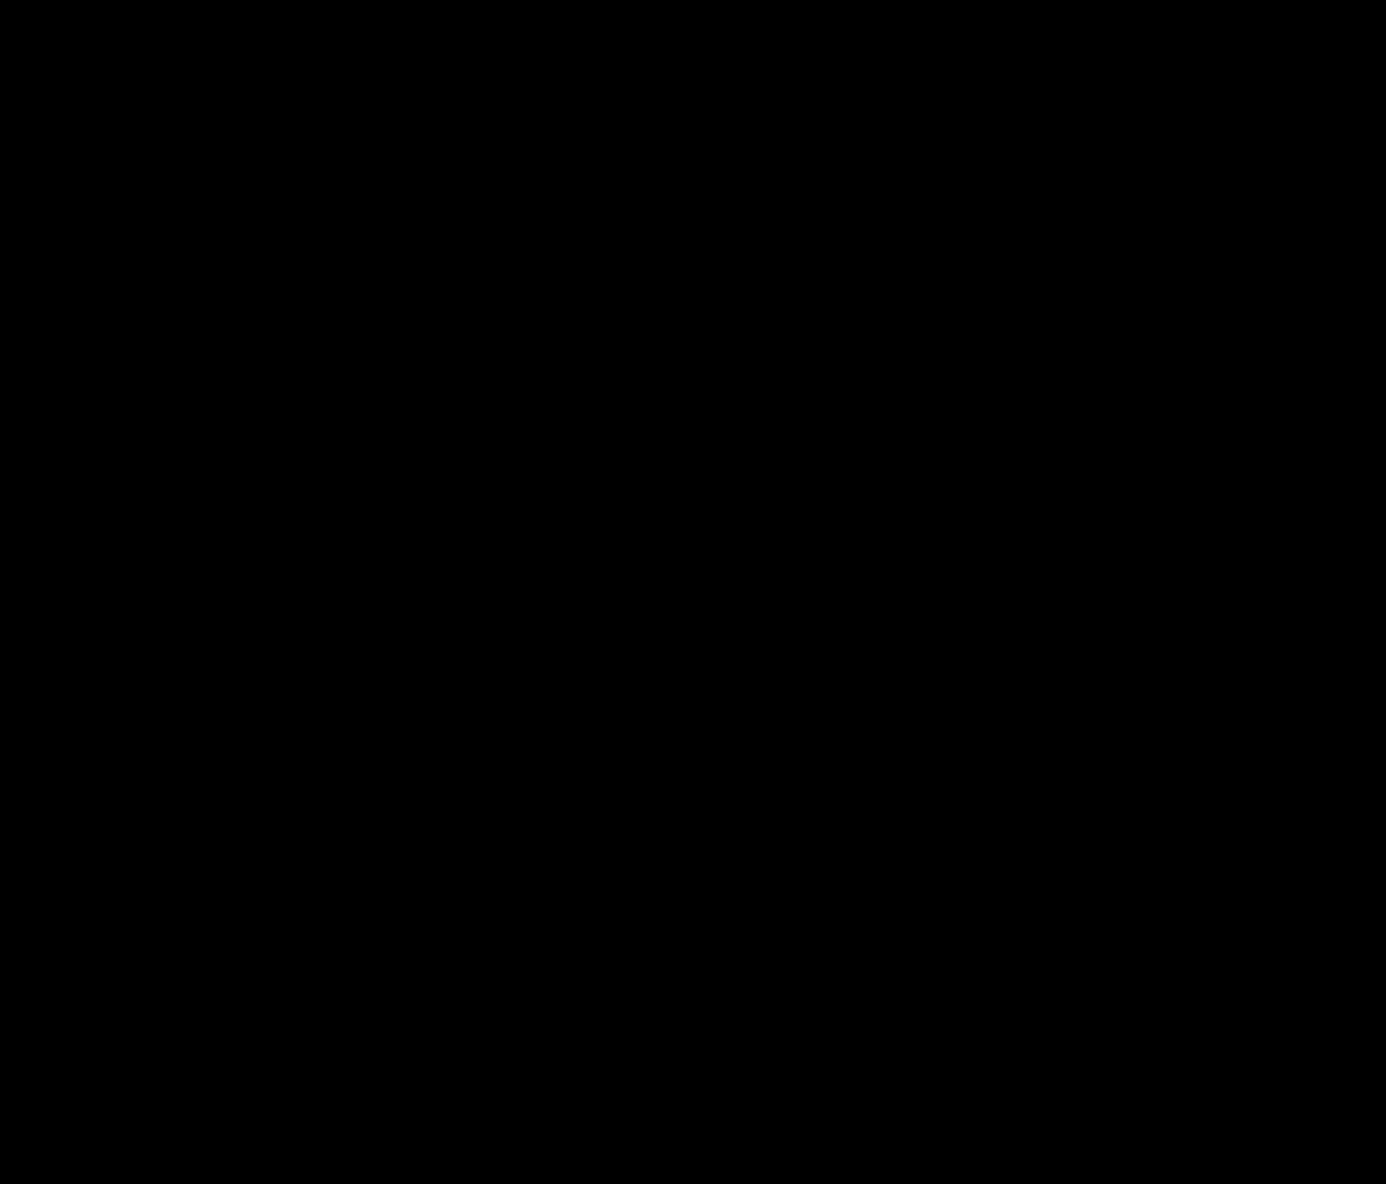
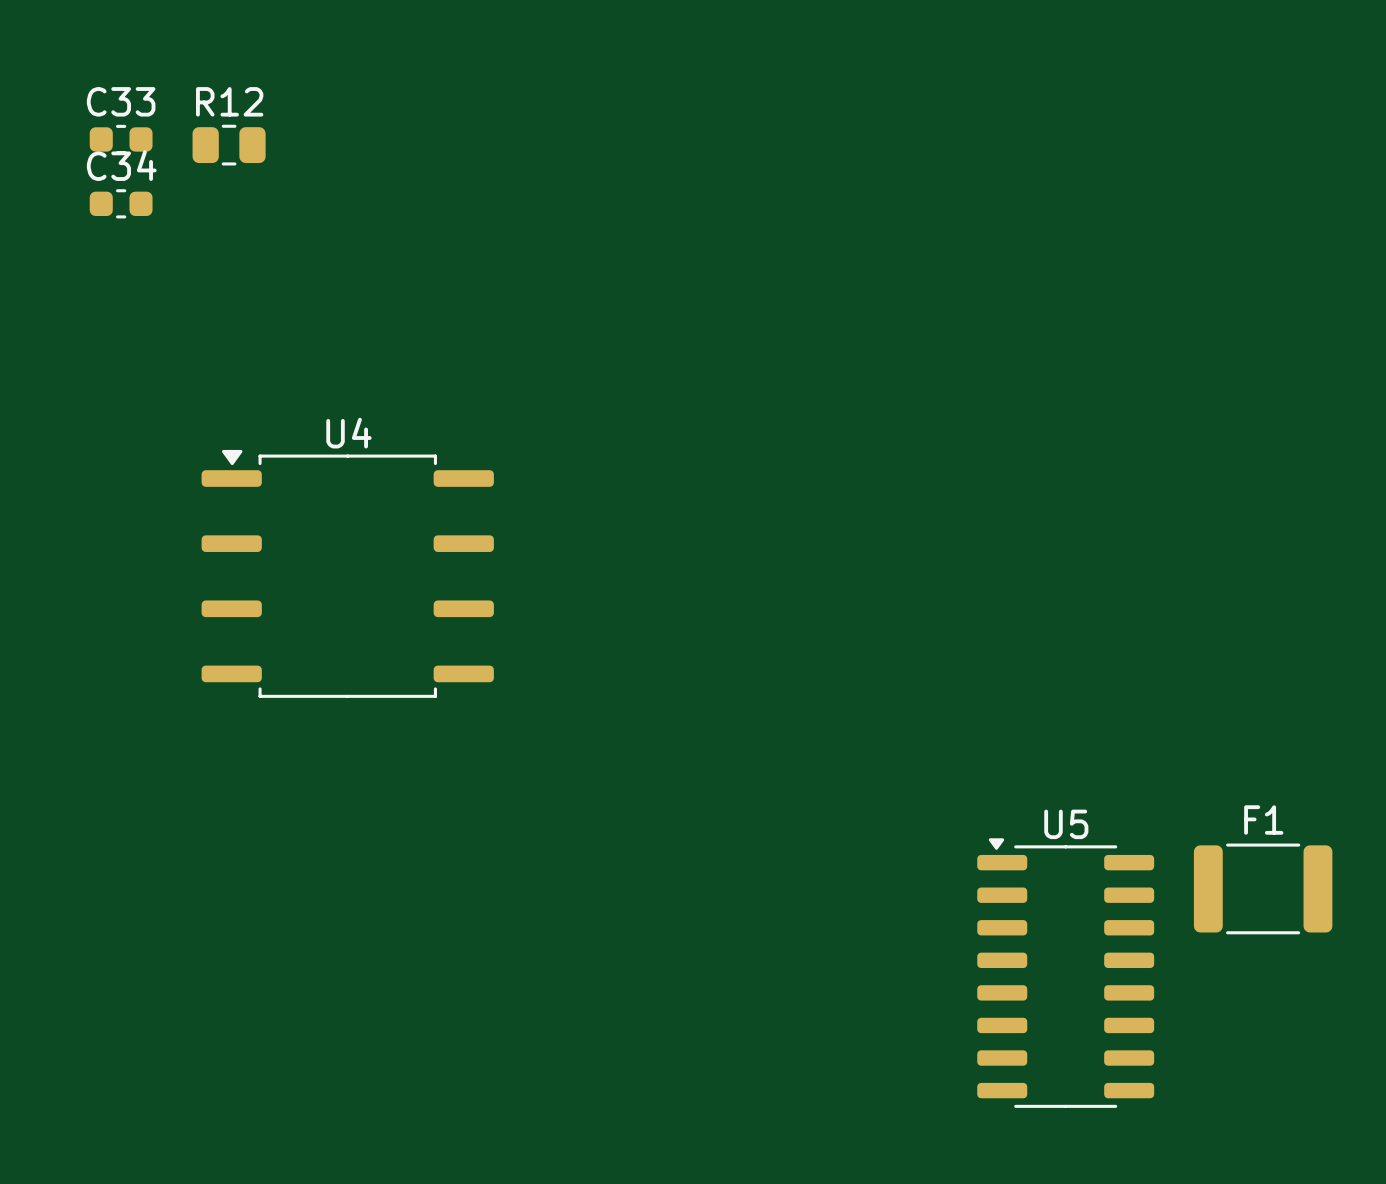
C33: none -> (121, 139)
R12: none -> (229, 145)
C34: none -> (121, 203)
U4: none -> (347, 573)
F1: none -> (1263, 888)
U5: none -> (1065, 973)

